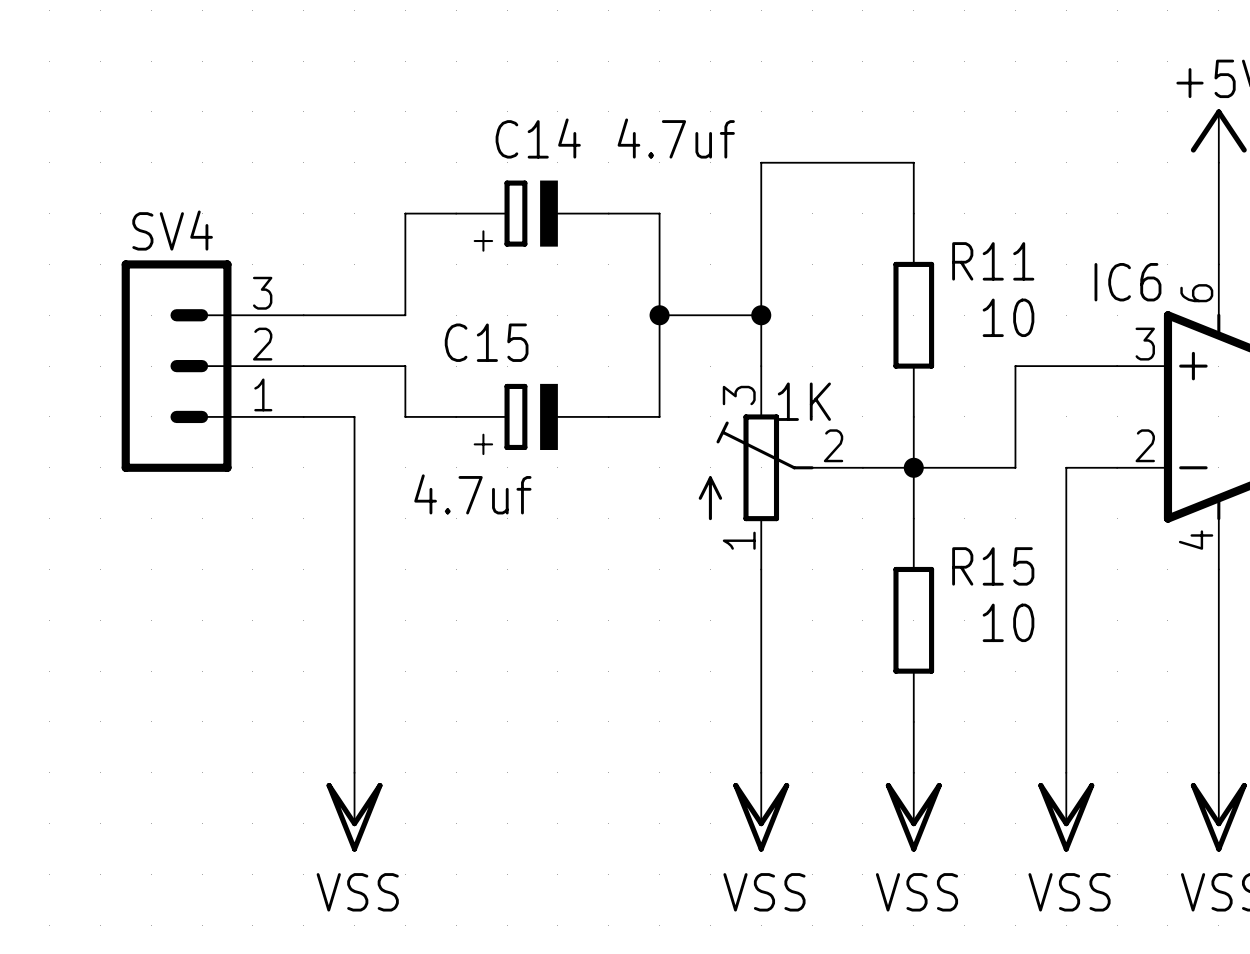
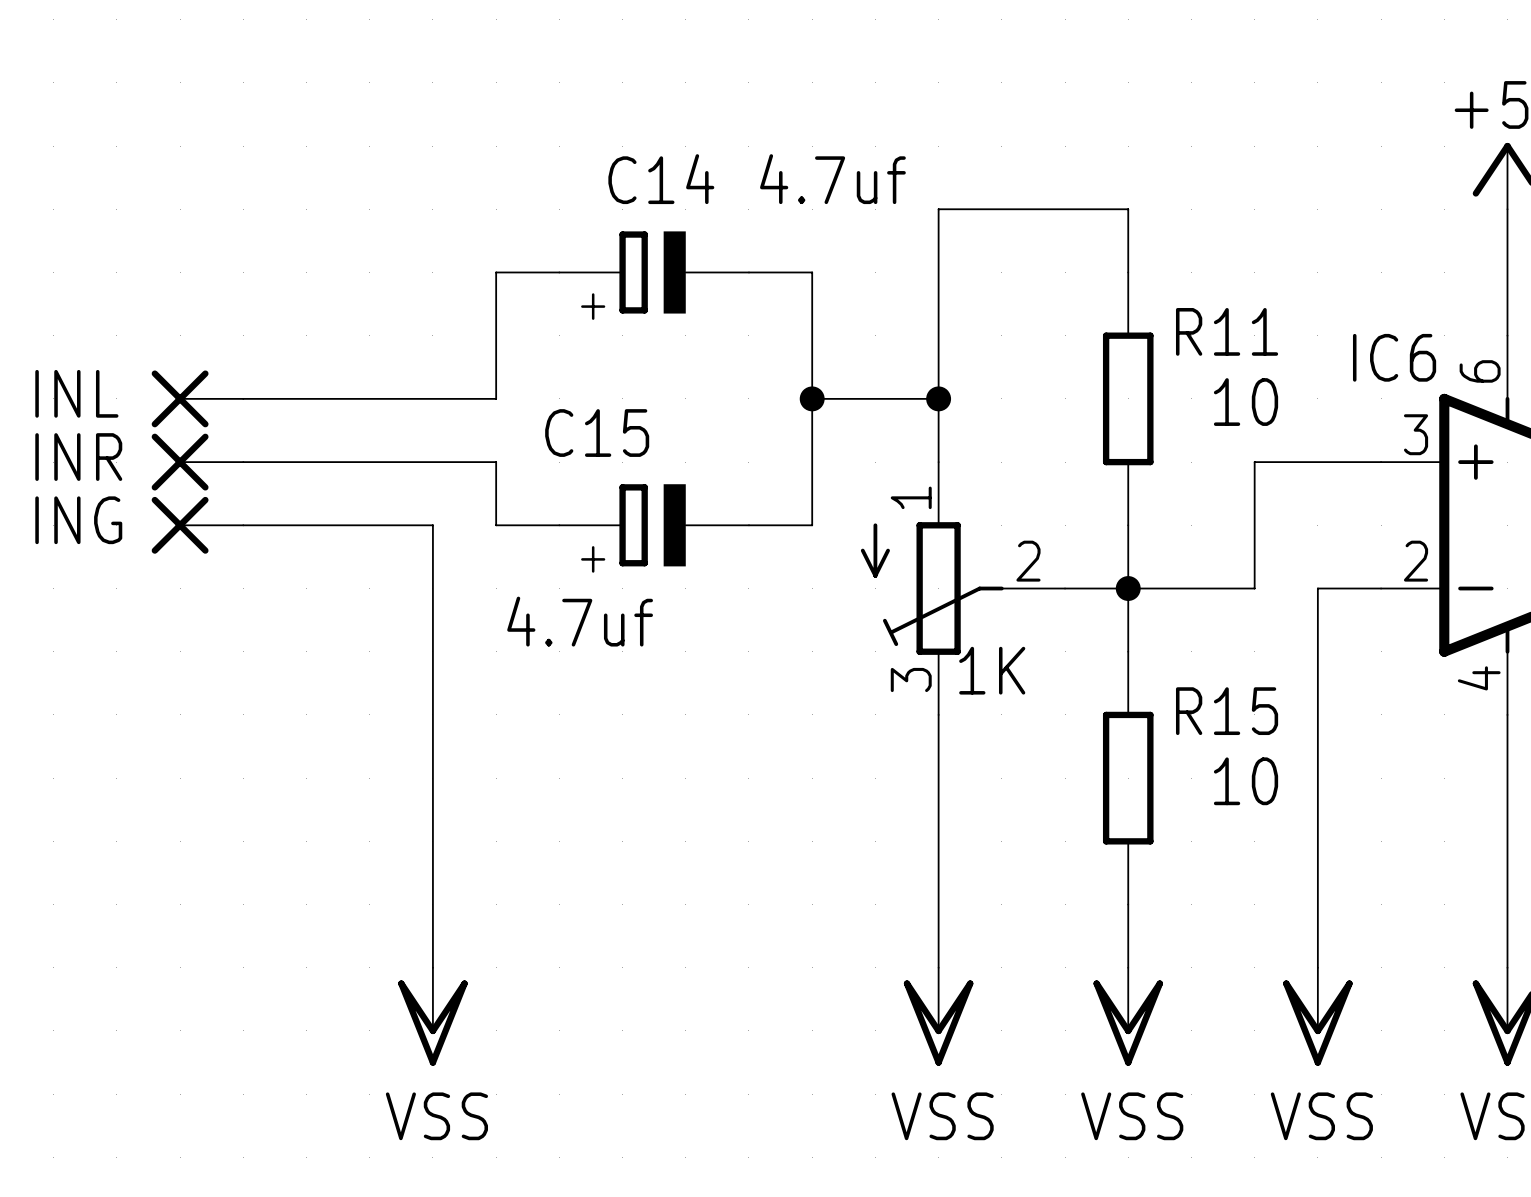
INL: none -> (197, 398)
INR: none -> (197, 462)
SV4: (212, 366) -> none
ING: none -> (197, 525)
1K flip: as is (756, 467) -> up-down (932, 588)

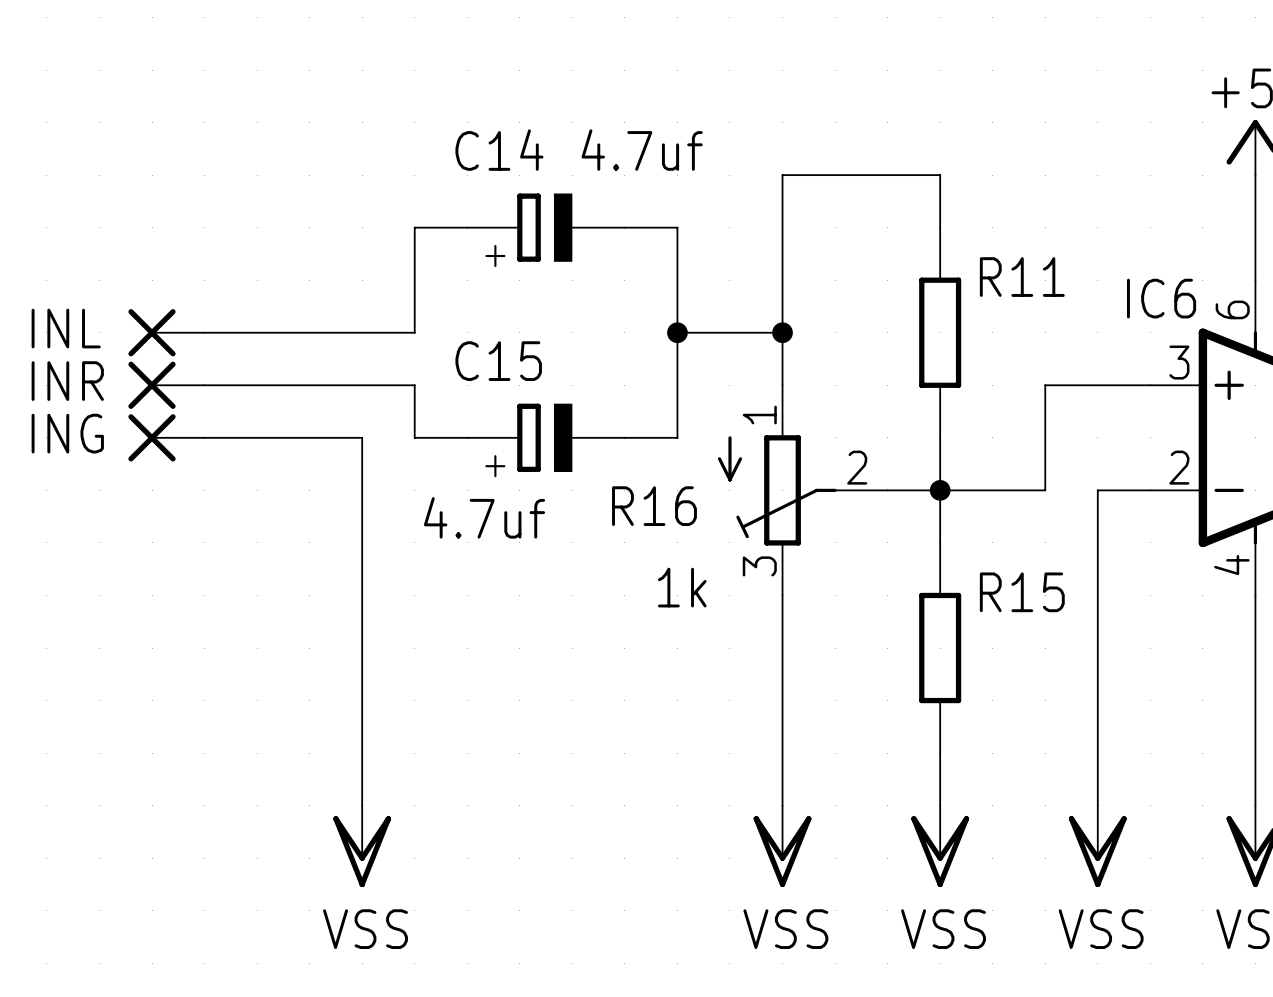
C14 name position: C14 (661, 179) -> C14 (499, 150)
C14 value position: 4.7uf (832, 179) -> 4.7uf (642, 150)
R11 value: 10 (1246, 402) -> none
1K name: 1K (992, 670) -> R16 (654, 506)
1K value: none -> 1k (682, 587)
R15 value: 10 (1246, 781) -> none

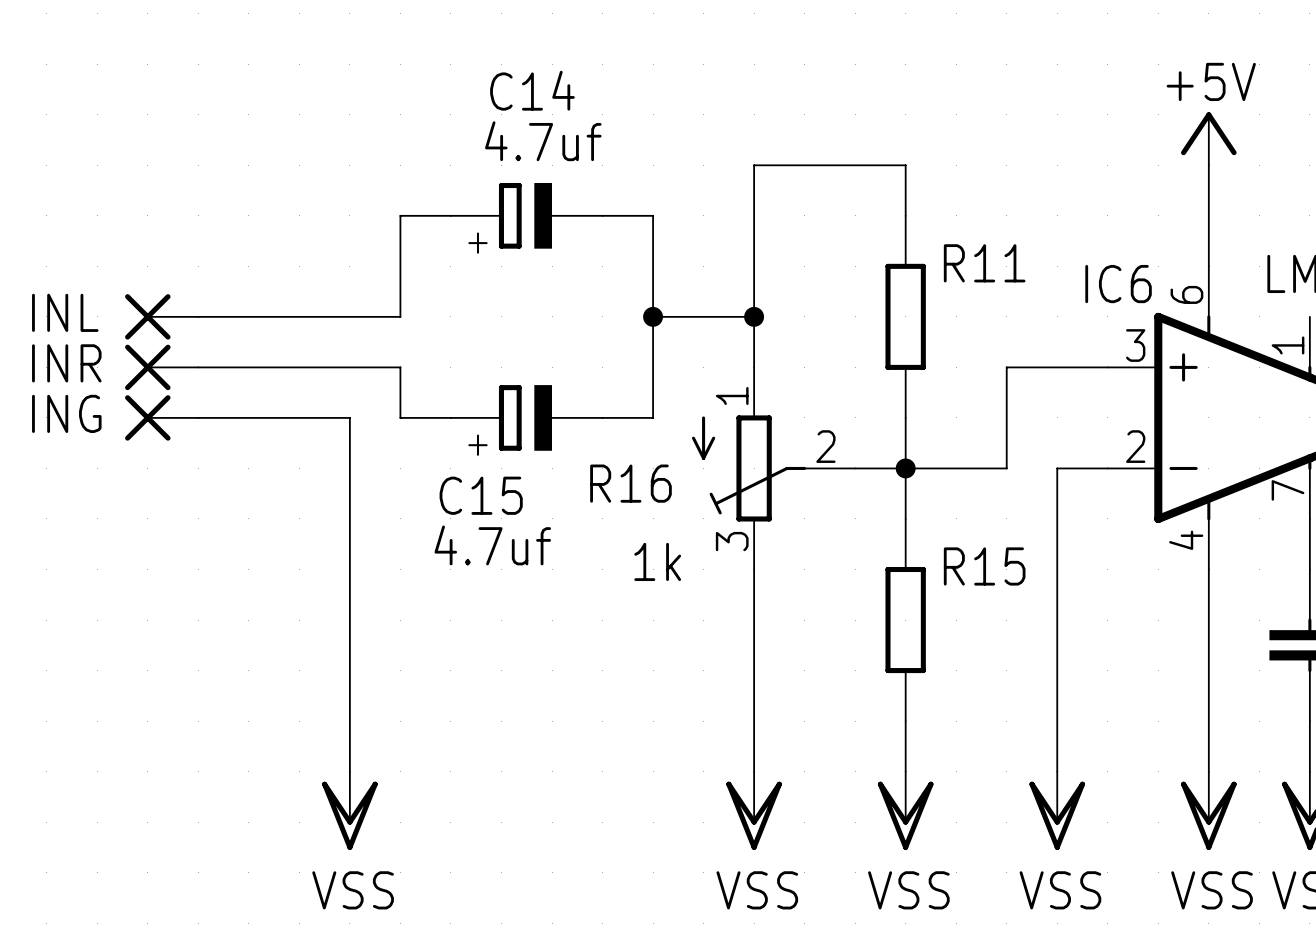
C14 name position: C14 (499, 150) -> C14 (532, 90)
C14 value position: 4.7uf (642, 150) -> 4.7uf (543, 141)
C15 name position: C15 (498, 361) -> C15 (481, 495)
C15 value position: 4.7uf (484, 517) -> 4.7uf (492, 545)

